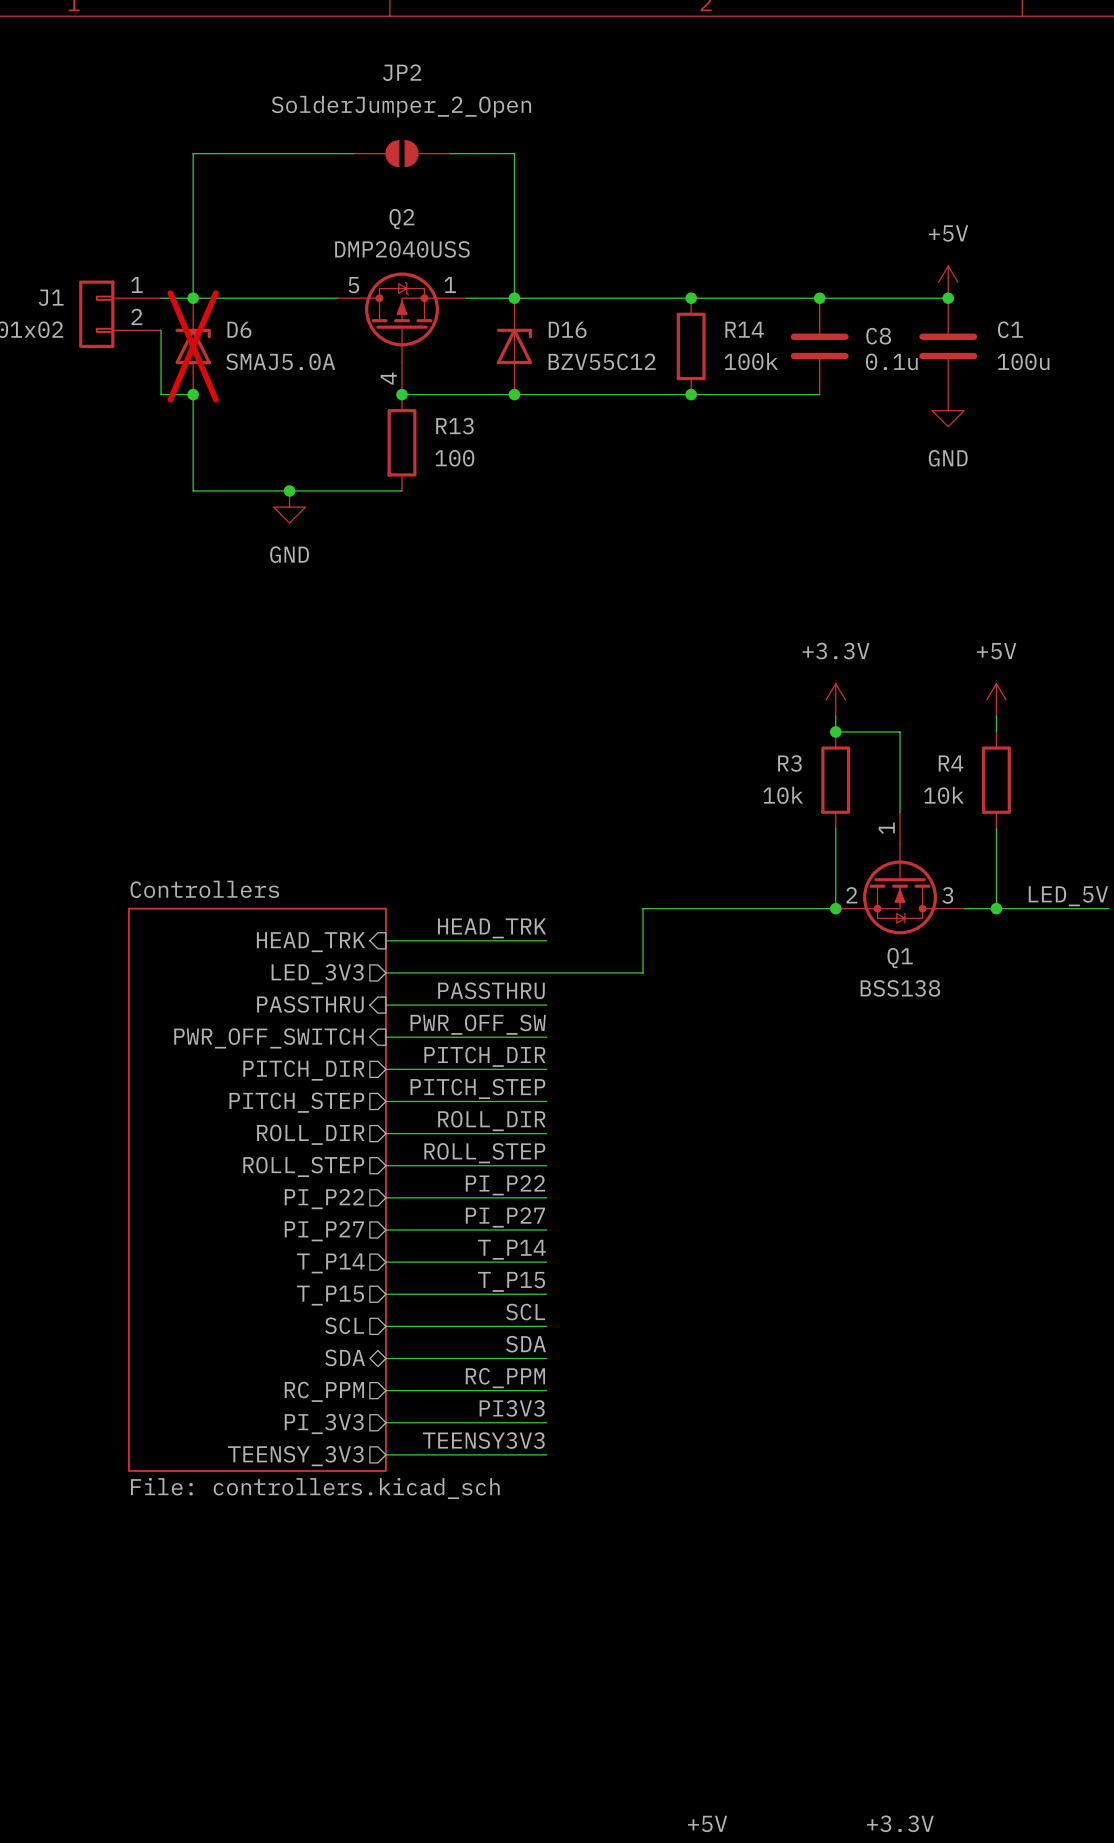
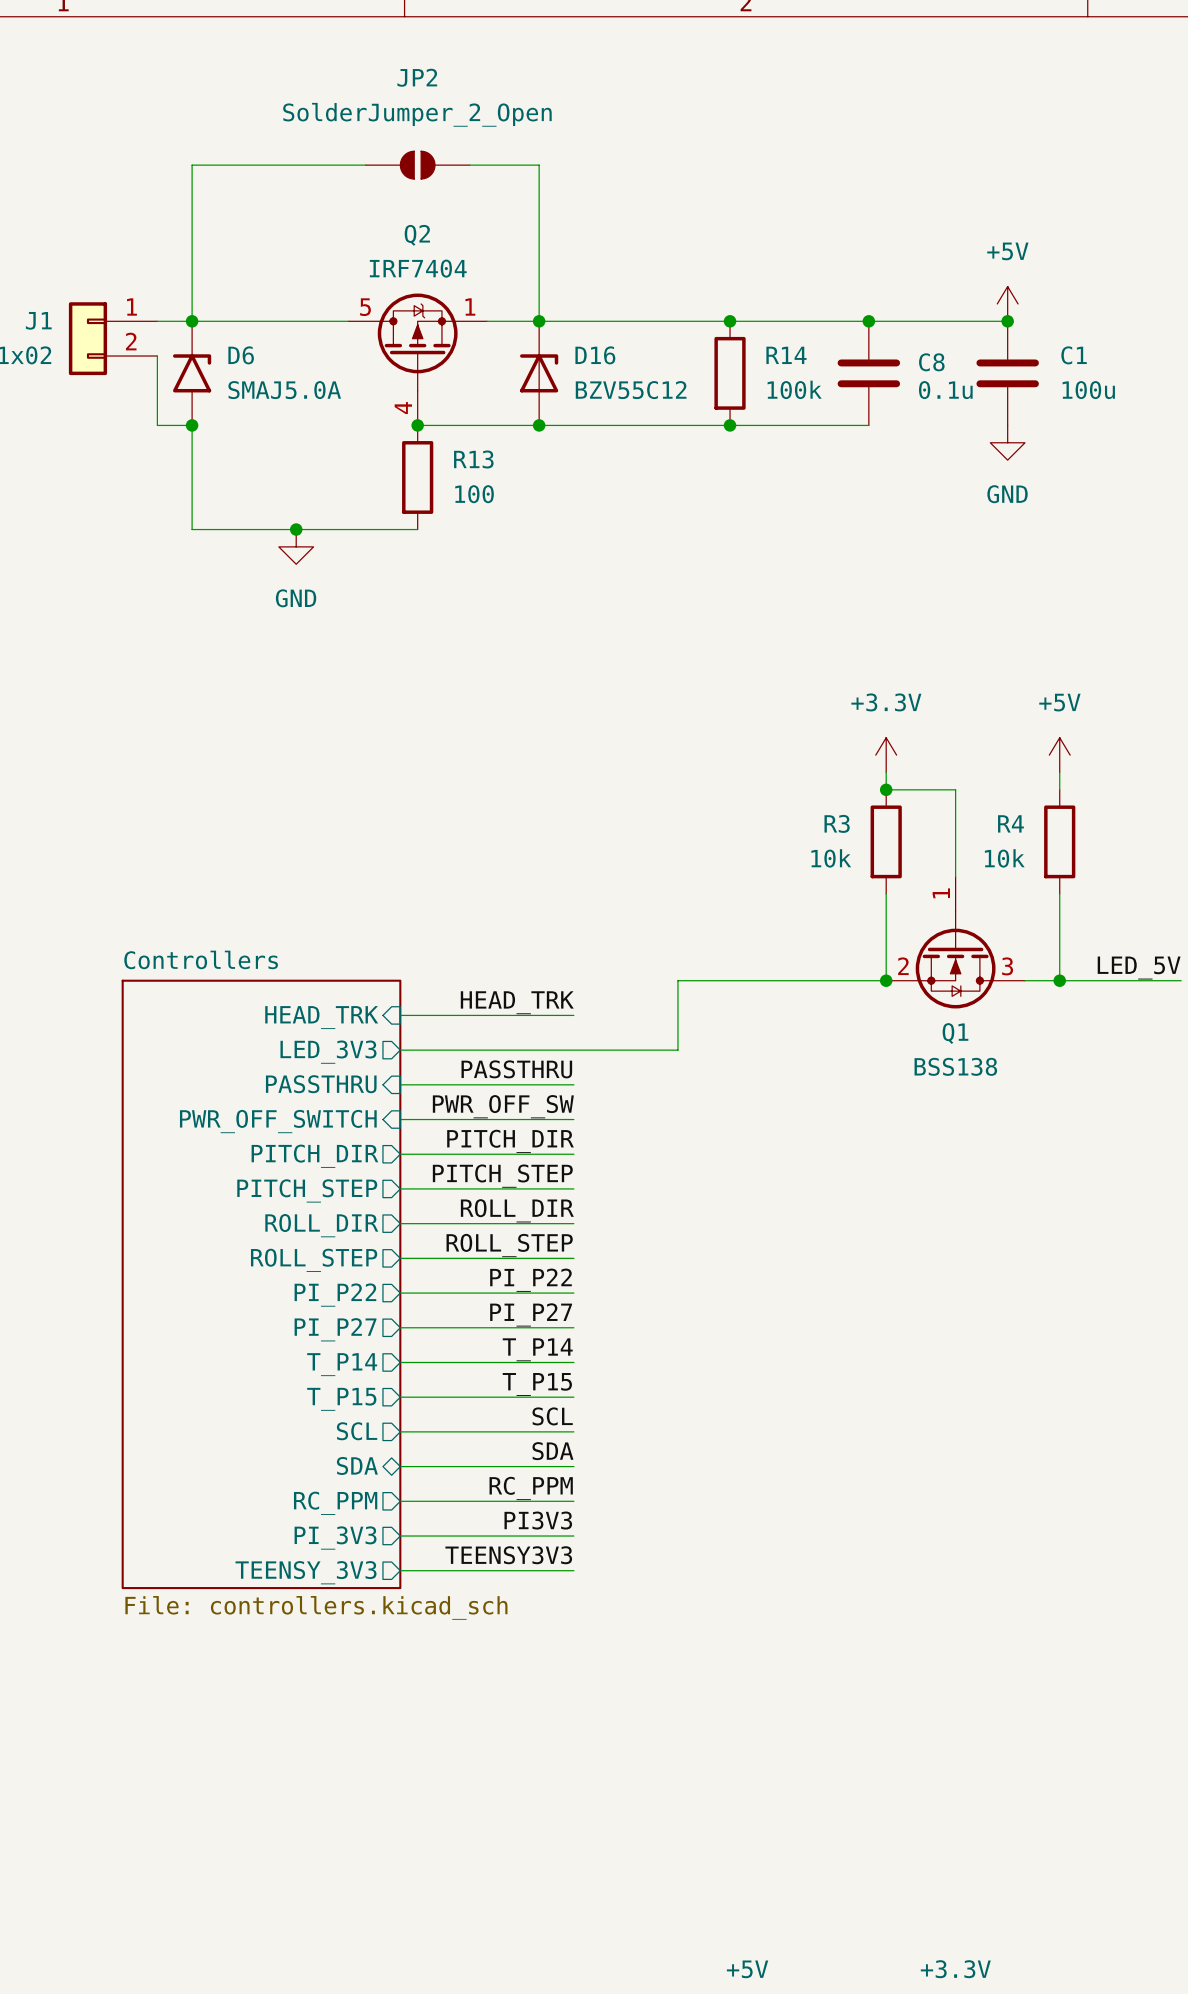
Q2 value: DMP2040USS (402, 249) -> IRF7404 (418, 268)
D6 do-not-place cross: (193, 346) -> none

